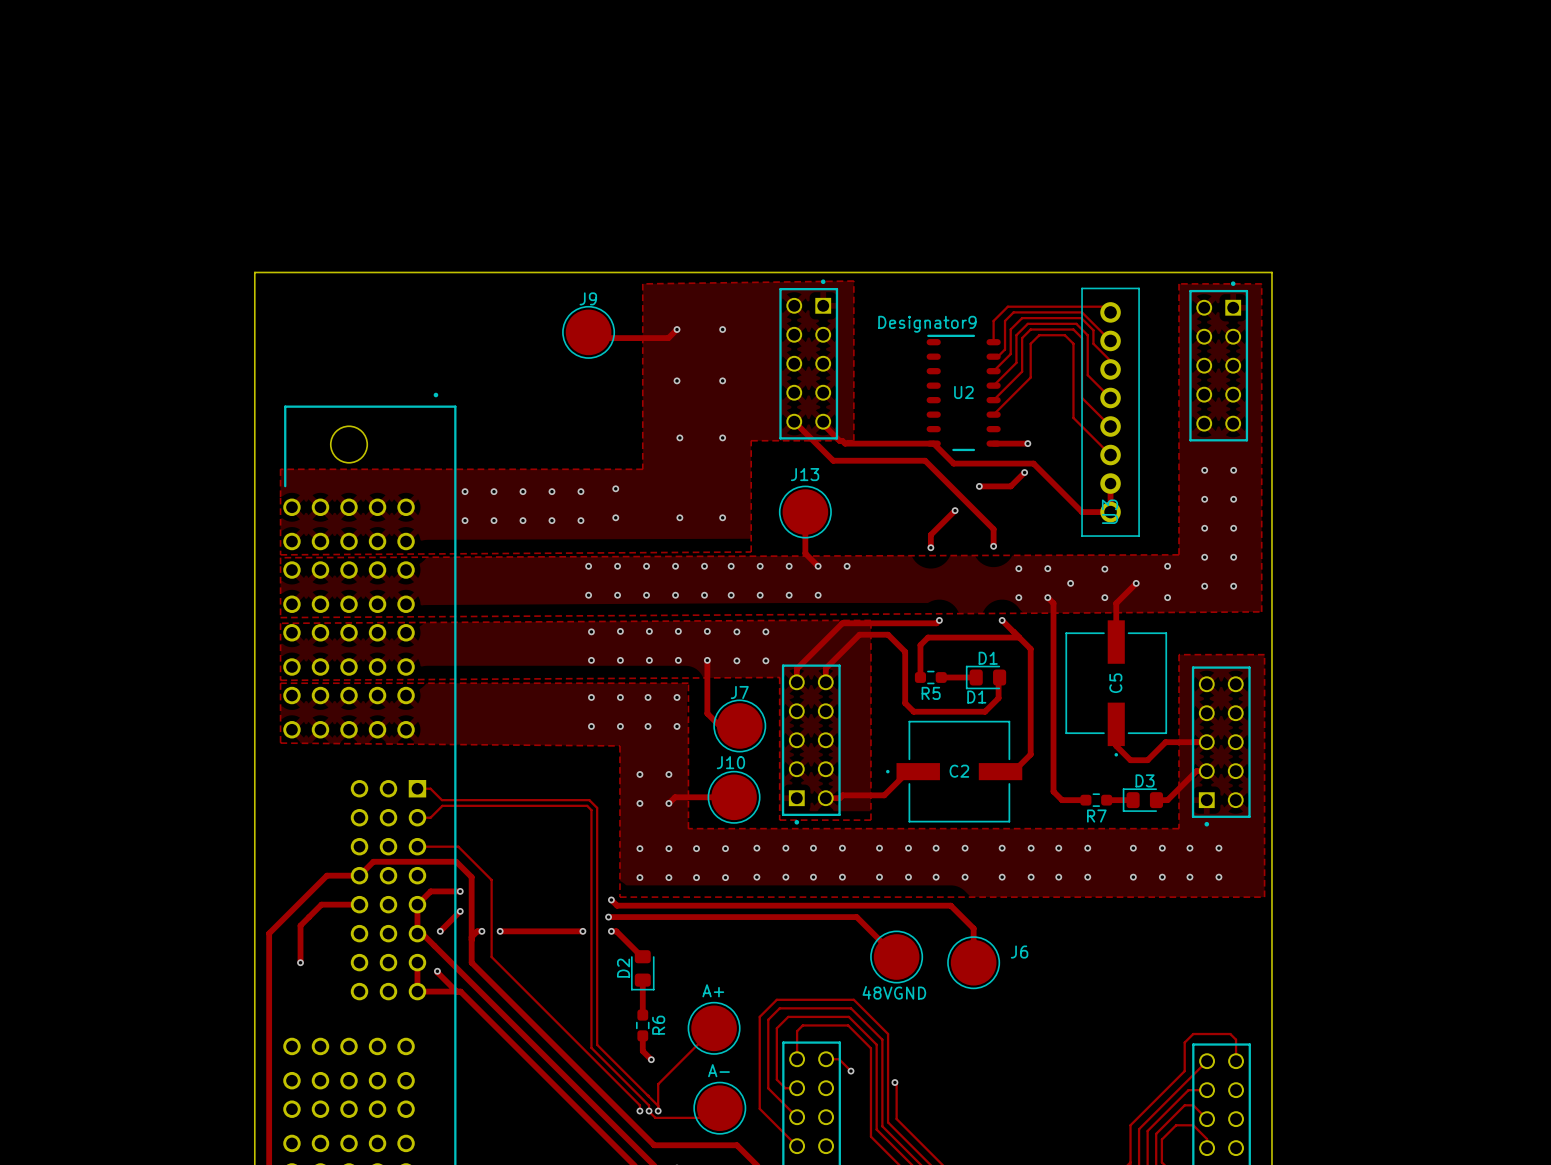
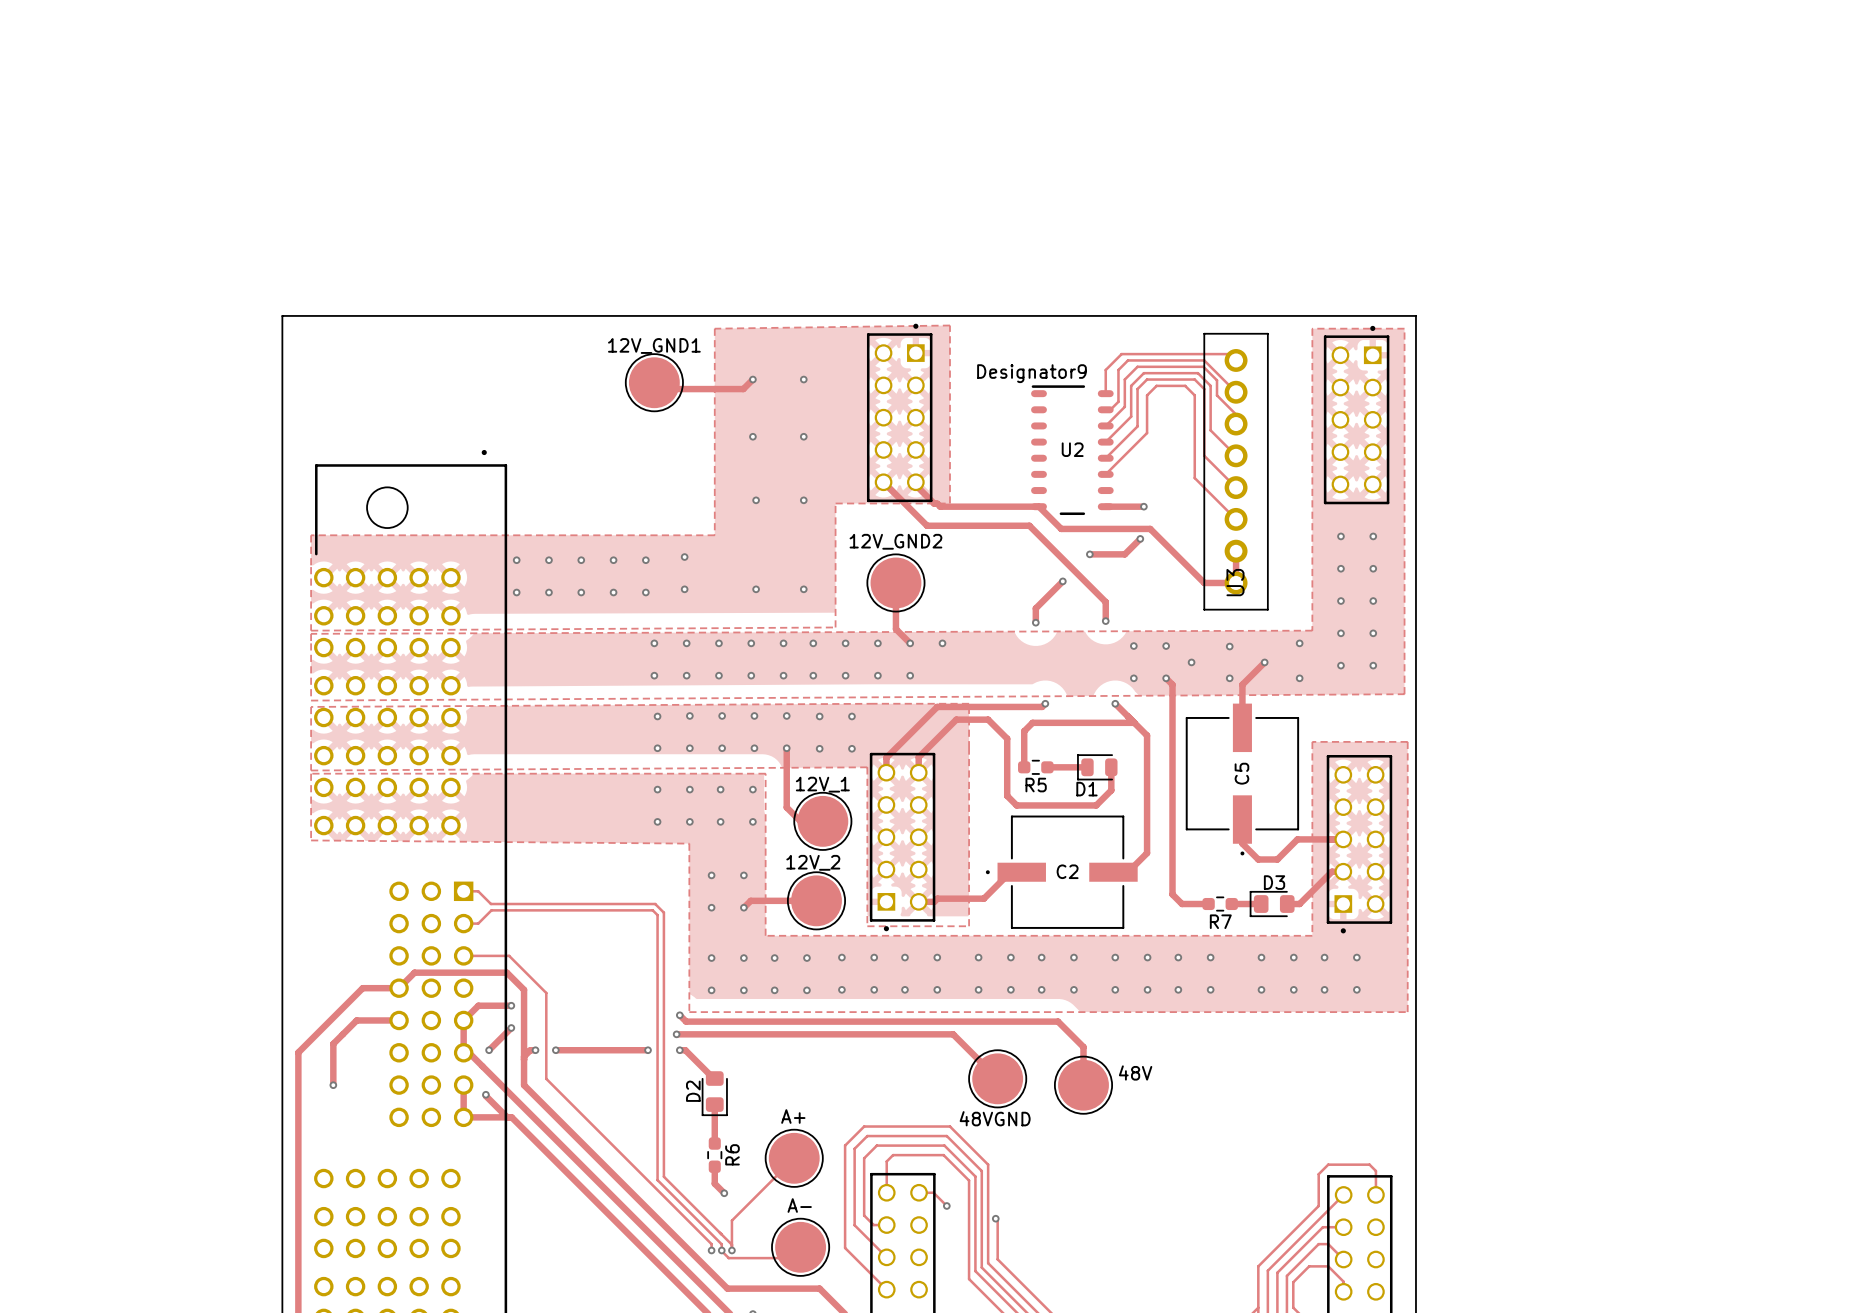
J9 name: J9 (588, 298) -> 12V_GND1 (654, 345)
J13 name: J13 (805, 474) -> 12V_GND2 (895, 541)
D1: (986, 677) -> none
part: none -> (1097, 767)
J7 name: J7 (739, 692) -> 12V_1 (822, 784)
J10 name: J10 (730, 762) -> 12V_2 (813, 862)
J6 name: J6 (1019, 952) -> 48V (1135, 1072)

